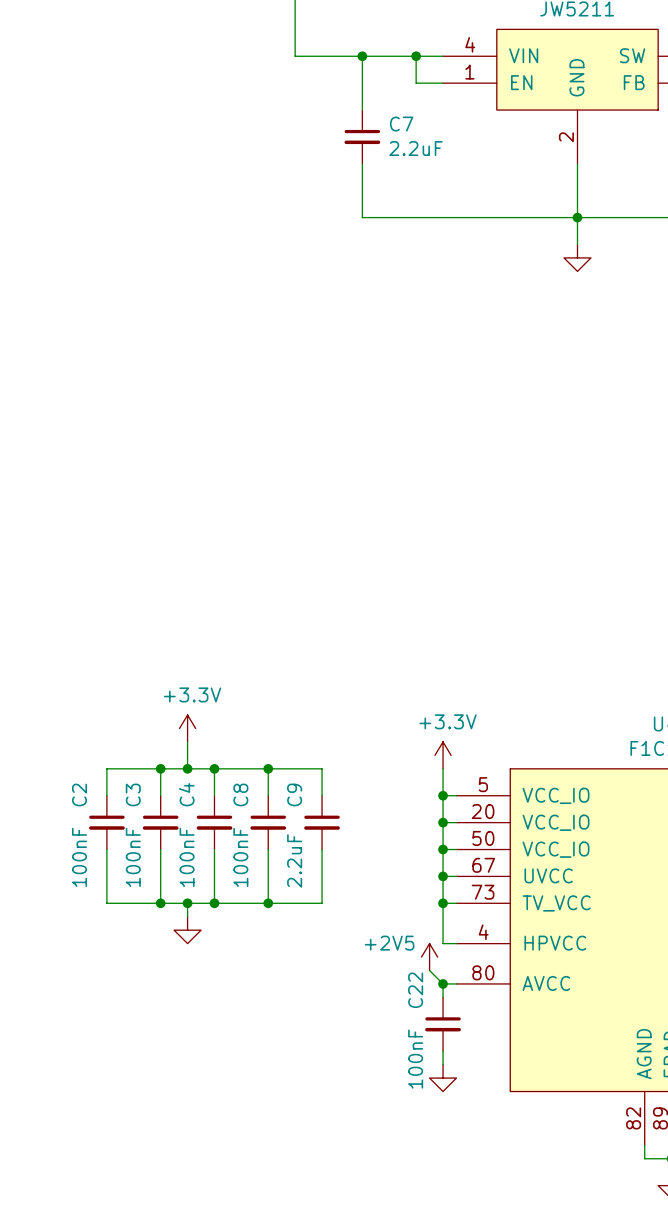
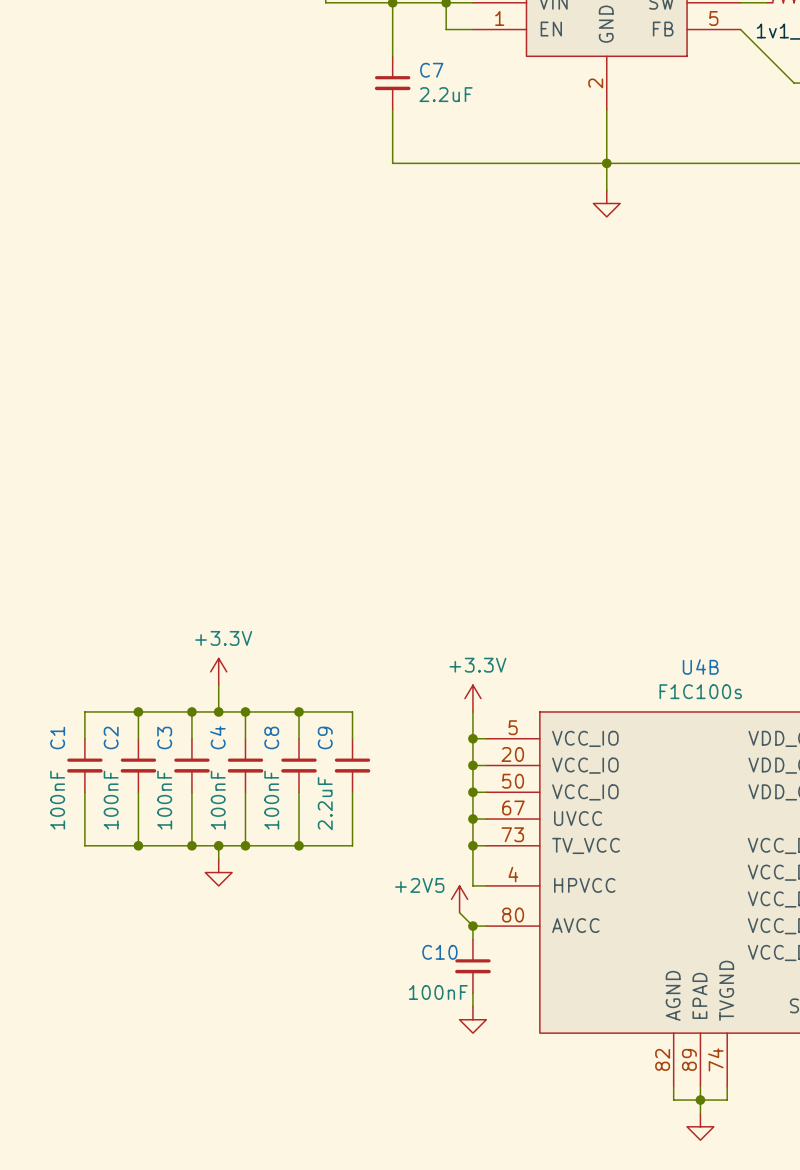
wire: none -> (138, 711) (84, 711) (84, 738)
junction: none -> (138, 711)
C1: none -> 100nF (84, 765)
wire: none -> (84, 792) (84, 845) (138, 845)
junction: none -> (138, 845)
C22 name: C22 (415, 990) -> C10 (439, 952)
C22 value rotation: 0° (415, 1059) -> 90° clockwise (438, 992)

